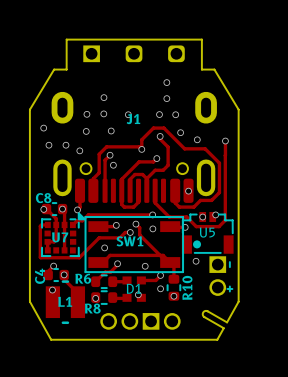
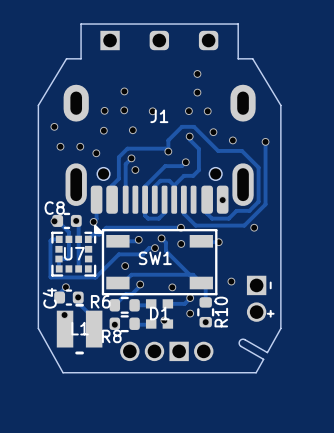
track: (225, 155) (225, 220) (219, 226) (196, 226) (186, 216) (169, 216) (165, 213) -> (265, 158) (265, 204) (244, 225) (195, 225)
via: (202, 217) -> none
U5: (207, 232) -> none

